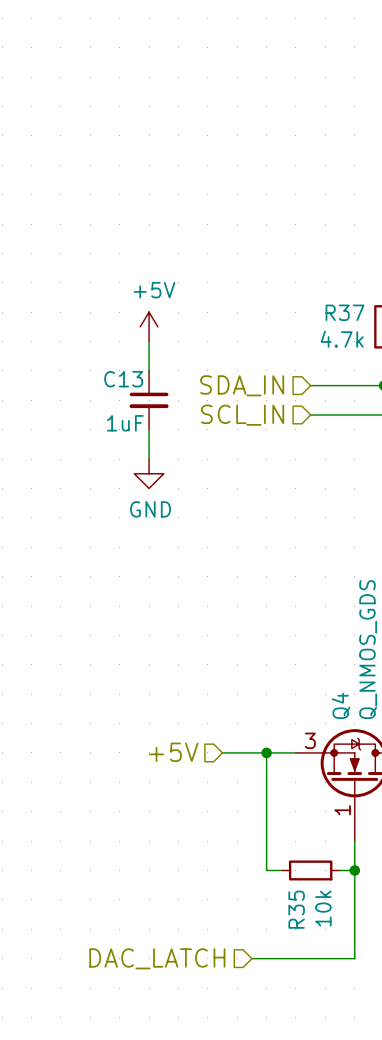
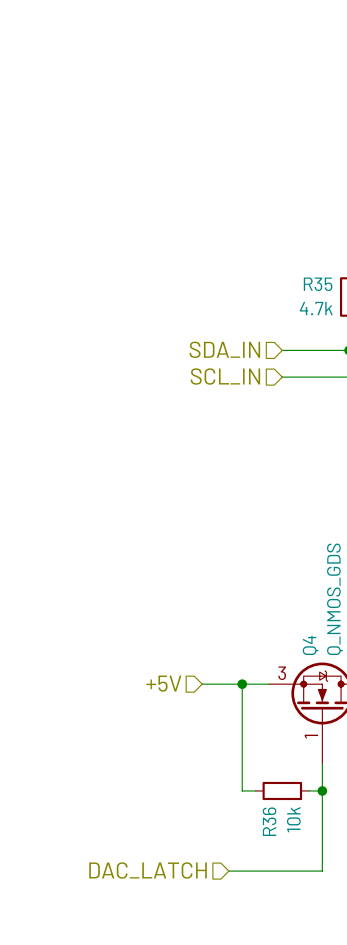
R37 name: R37 (345, 312) -> R35 (318, 284)
power symbol: +5V (149, 326) -> none
wire: (149, 341) (149, 370) -> none
C13: 1uF (149, 400) -> none
wire: (149, 429) (149, 459) -> none
power symbol: GND (149, 473) -> none
R35 name: R35 (296, 909) -> R36 (269, 821)

